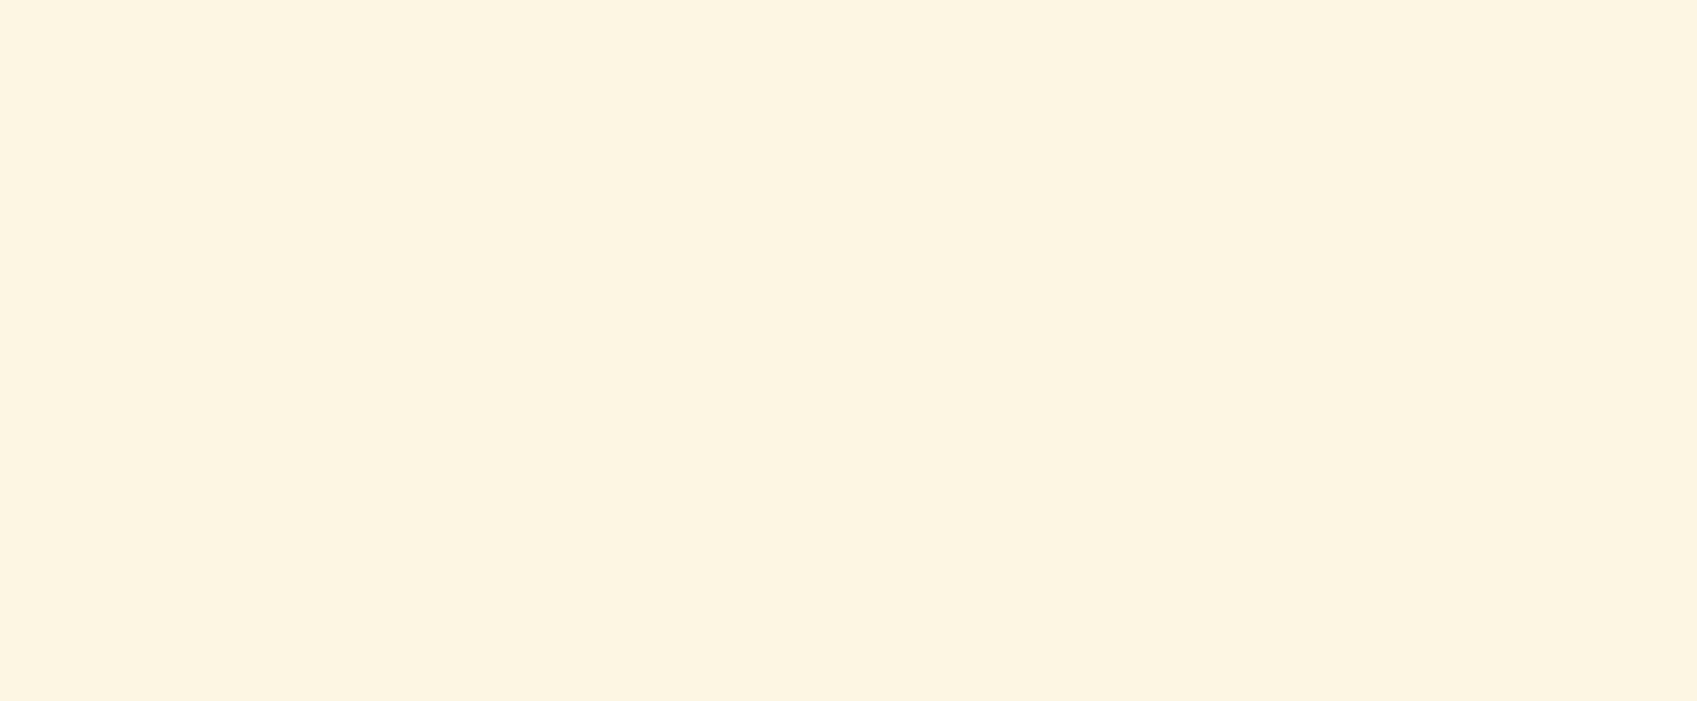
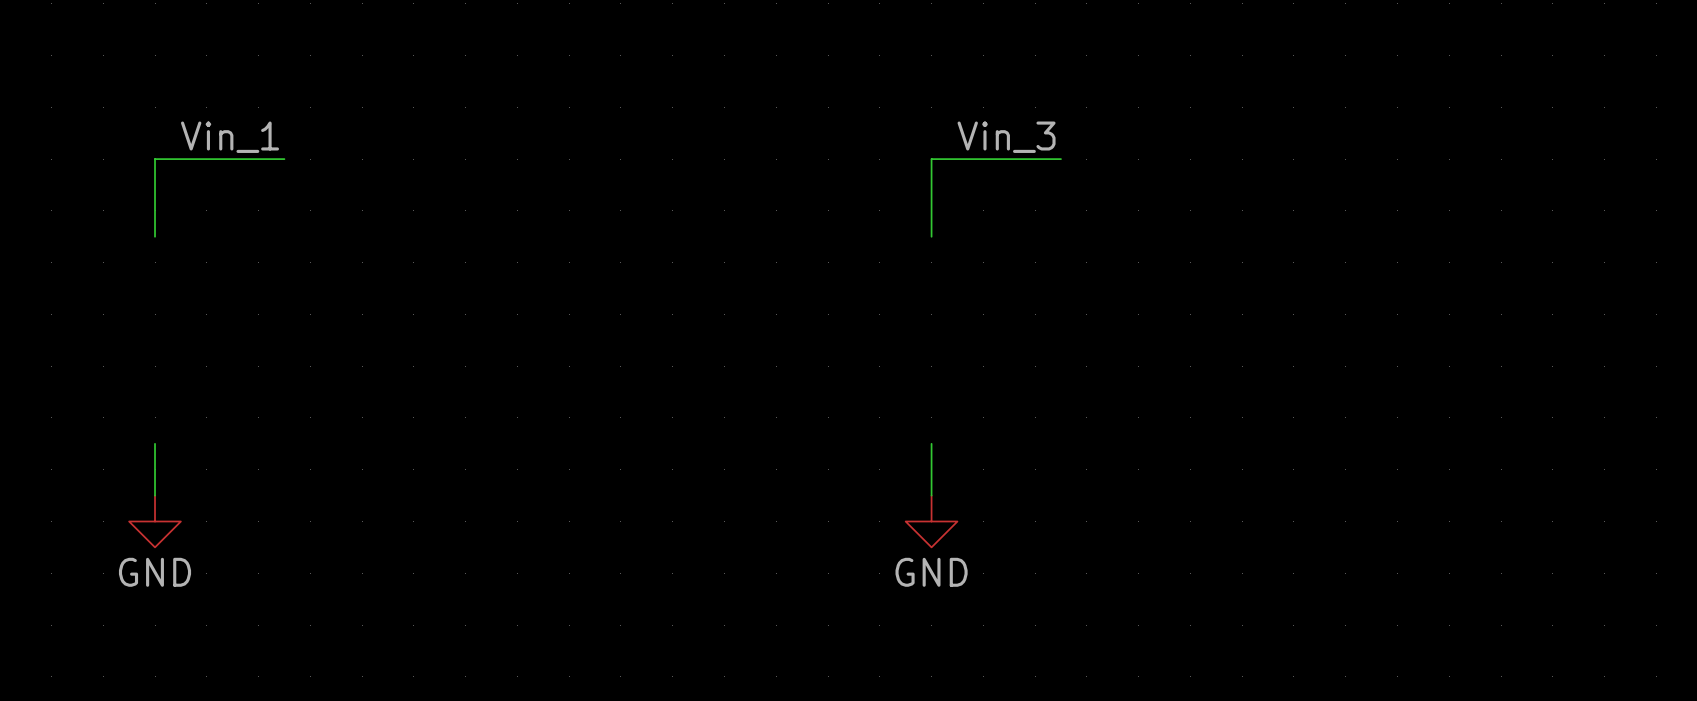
label: none -> Vin_1 (230, 137)
label: none -> Vin_3 (1006, 137)
wire: none -> (284, 159) (155, 159) (155, 236)
wire: none -> (1060, 159) (931, 159) (931, 236)
wire: none -> (155, 443) (155, 495)
wire: none -> (931, 443) (931, 495)
power symbol: none -> GND (155, 521)
power symbol: none -> GND (931, 521)

